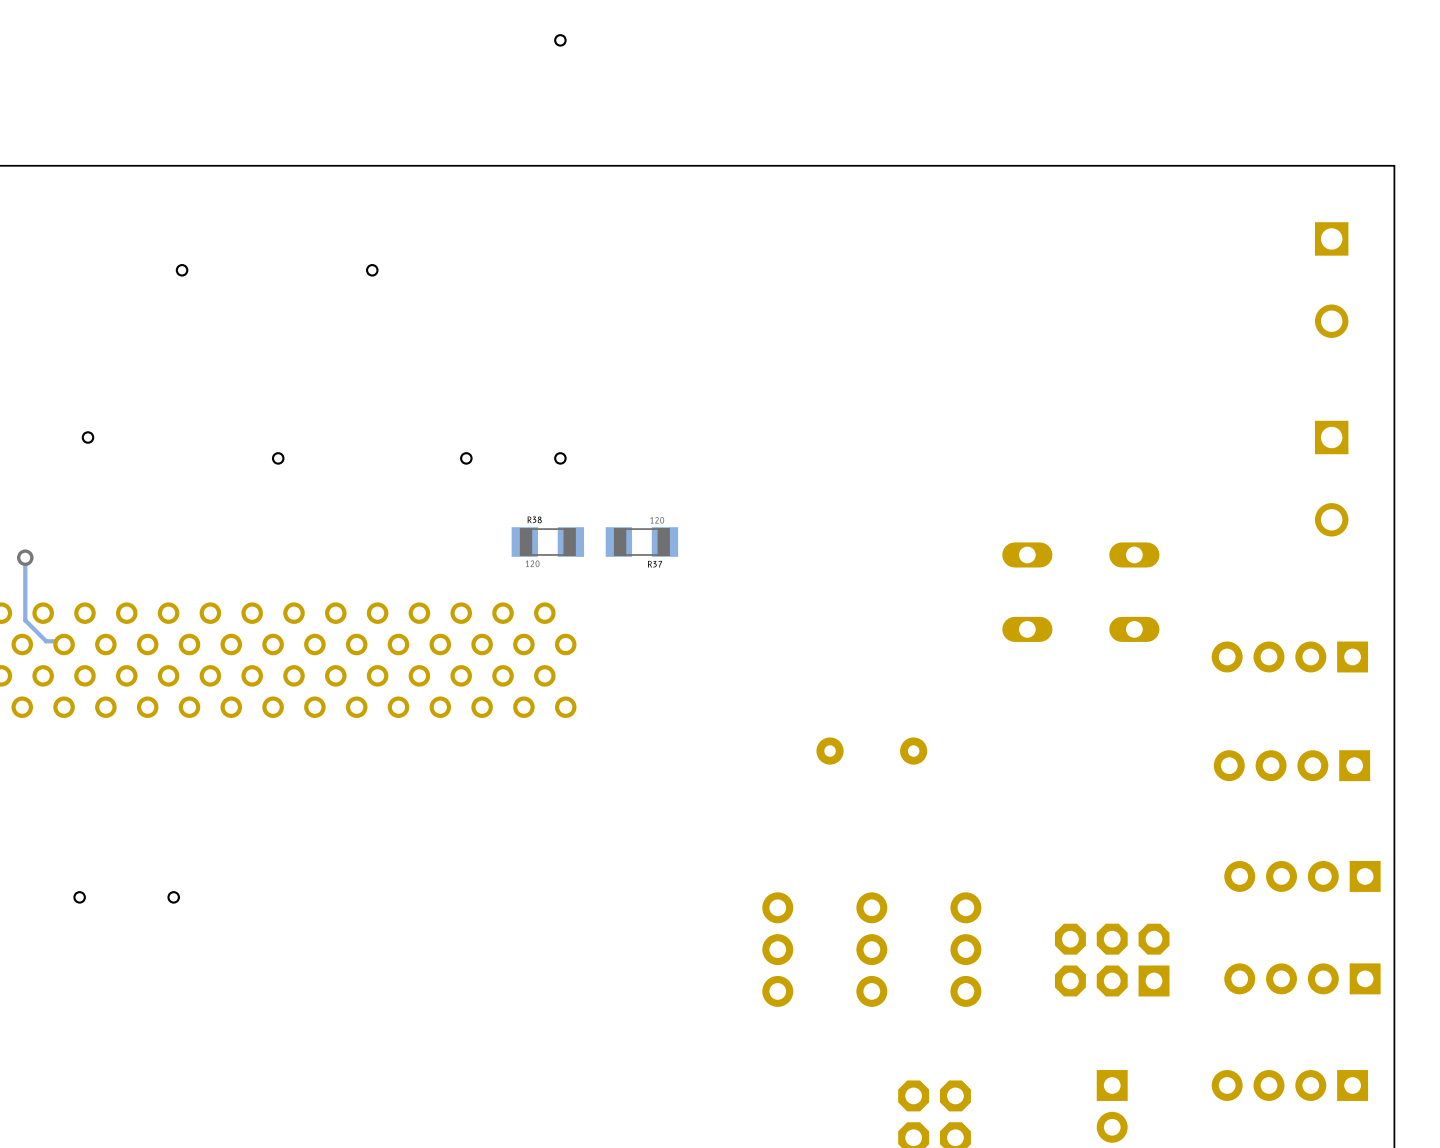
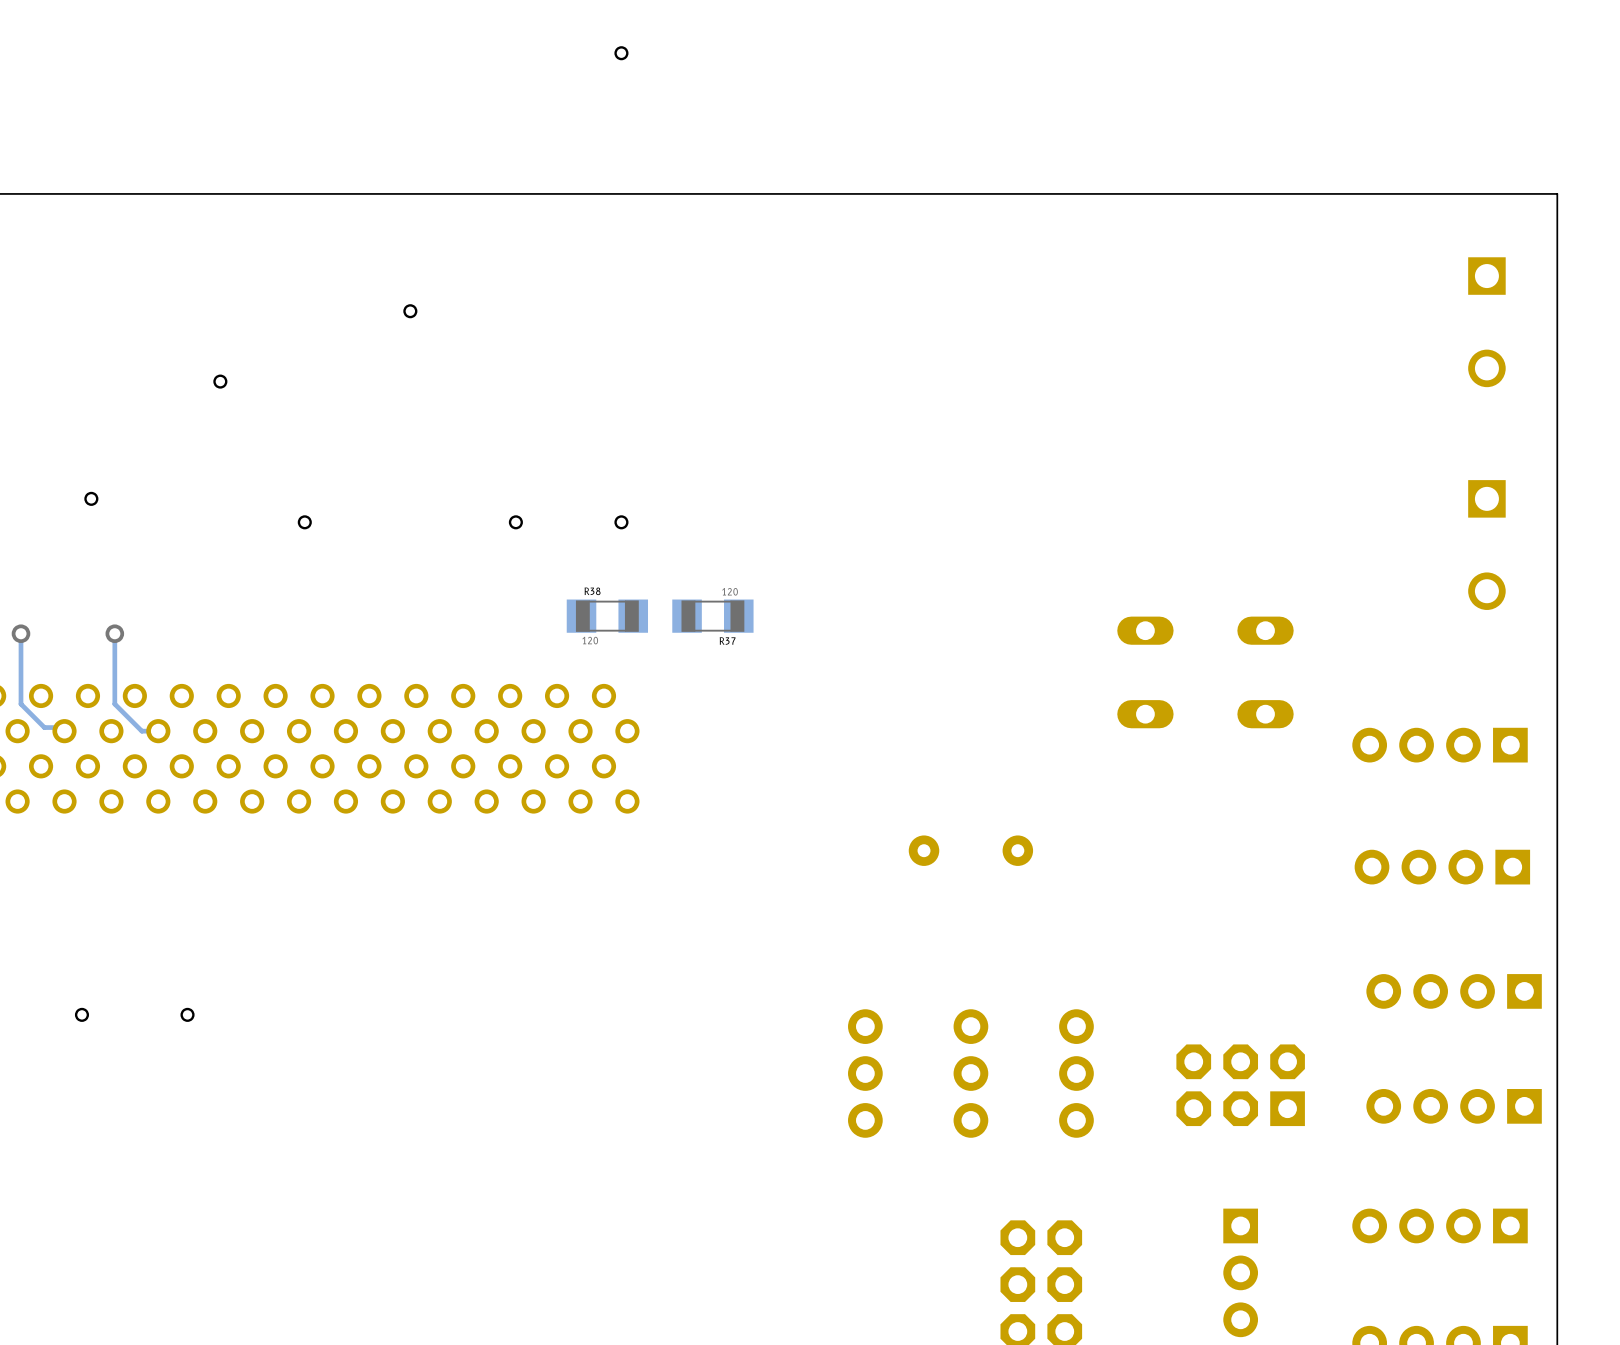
part position: (182, 270) -> (220, 381)
track: none -> (114, 633) (114, 704) (141, 731) (158, 731)
via: none -> (114, 633)

